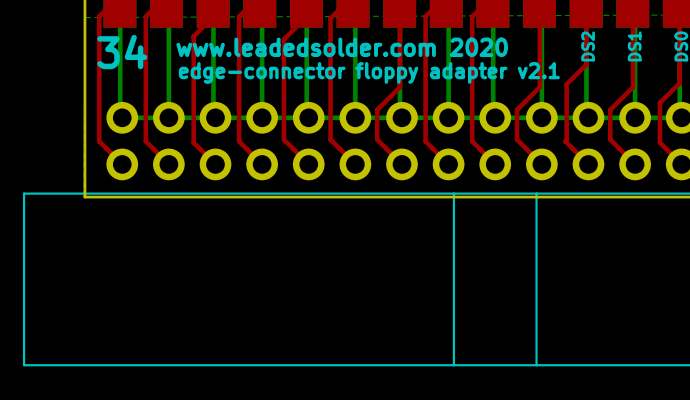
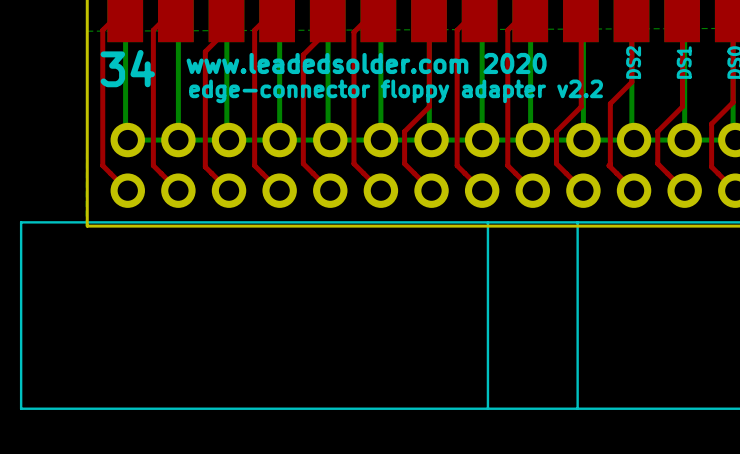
text: edge-connector floppy adapter v2.1 (369, 72) -> edge-connector floppy adapter v2.2 (396, 91)

